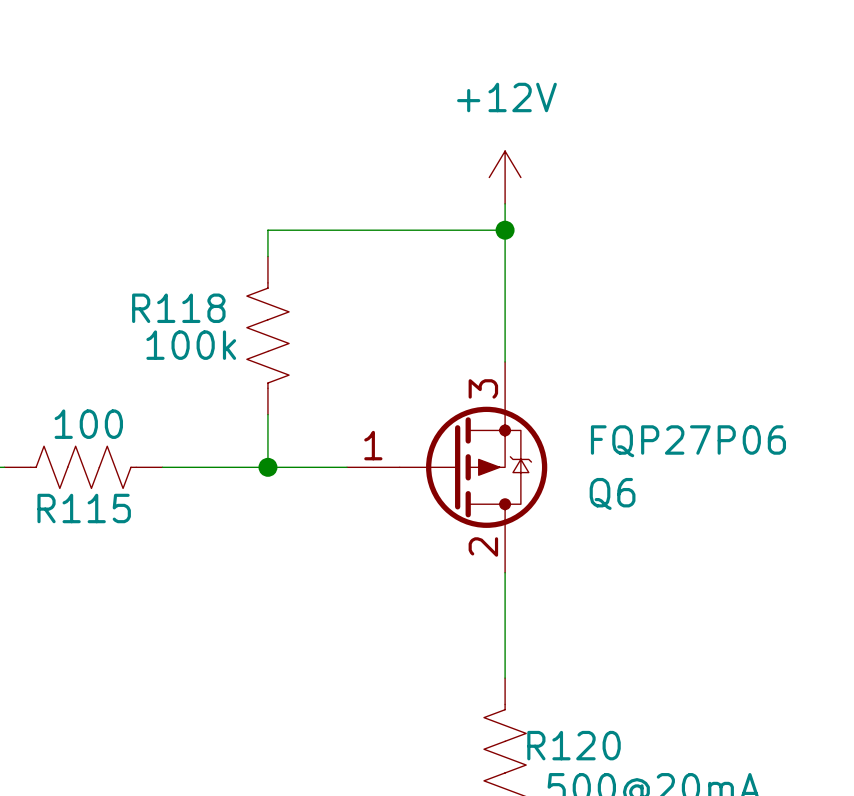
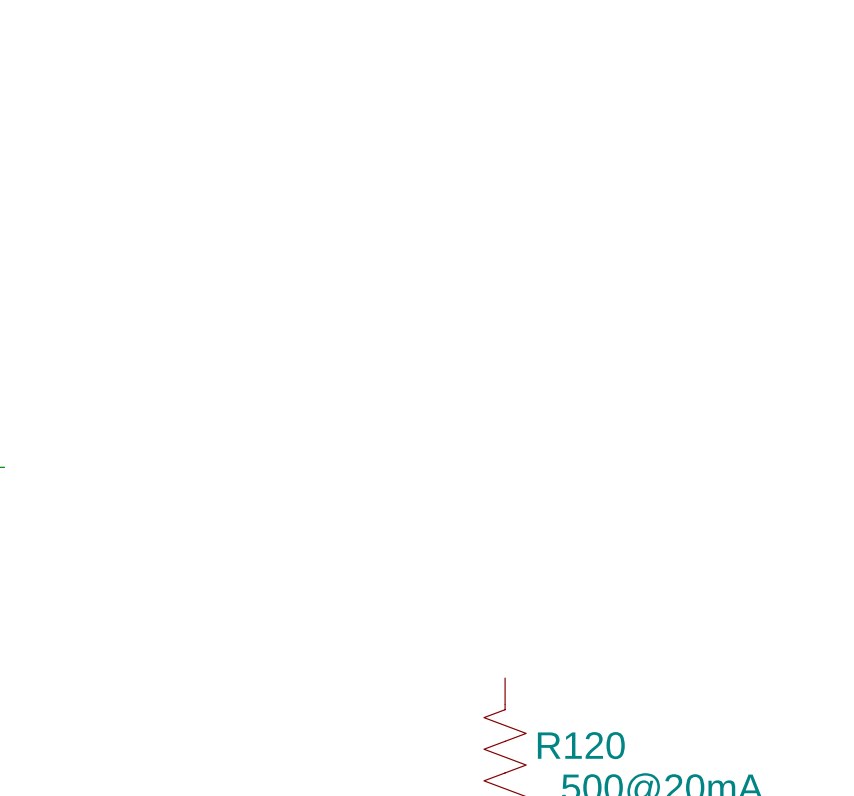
power symbol: +12V (505, 177) -> none
wire: (505, 203) (505, 361) -> none
wire: (505, 230) (267, 230) (267, 256) -> none
junction: (505, 230) -> none
R118: 100k (267, 335) -> none
wire: (267, 414) (267, 467) -> none
R115: 100 (83, 467) -> none
wire: (162, 467) (347, 467) -> none
junction: (267, 467) -> none
Q6: FQP27P06 (447, 467) -> none
wire: (505, 572) (505, 678) -> none

